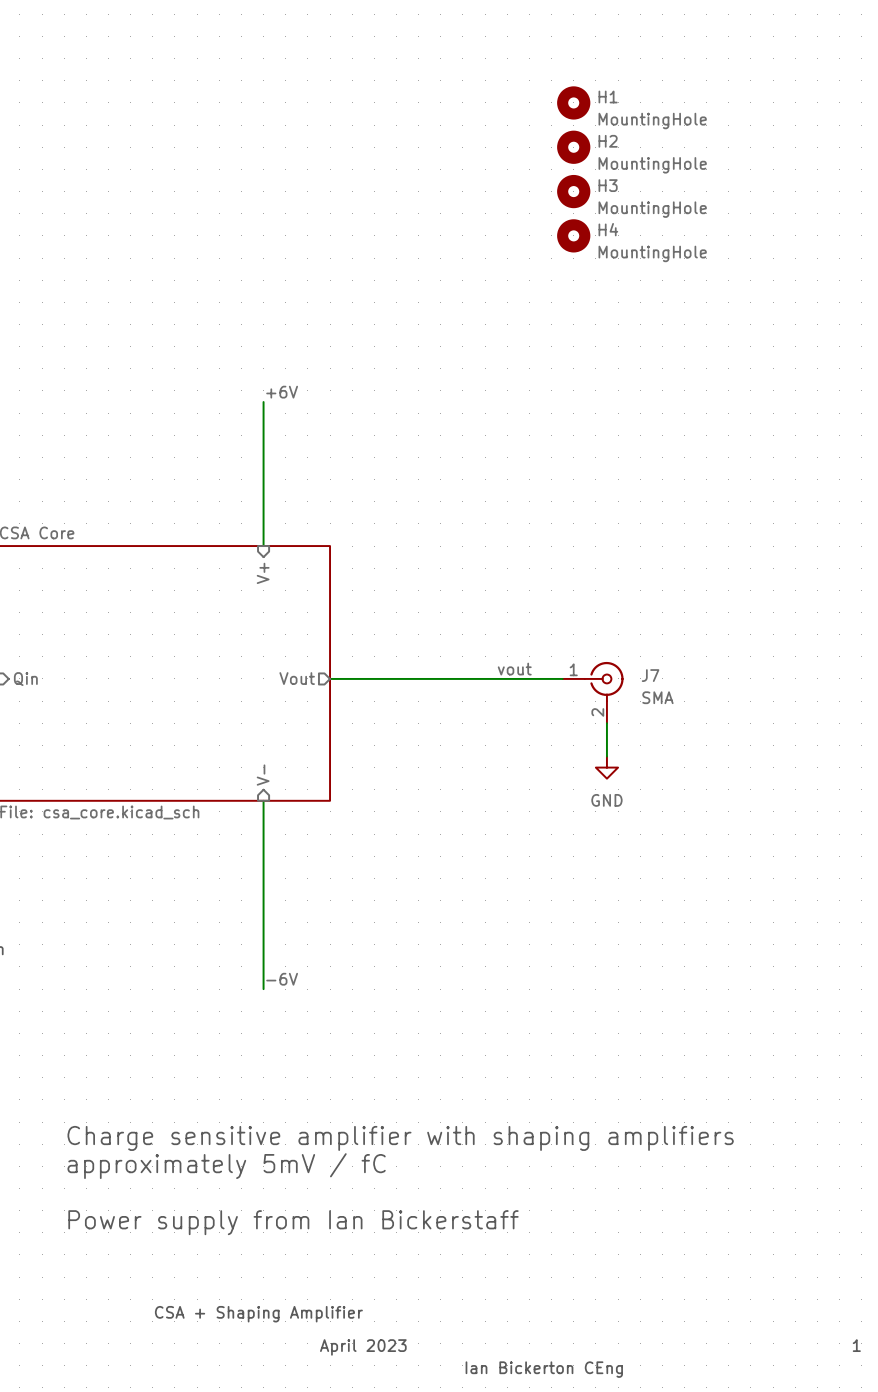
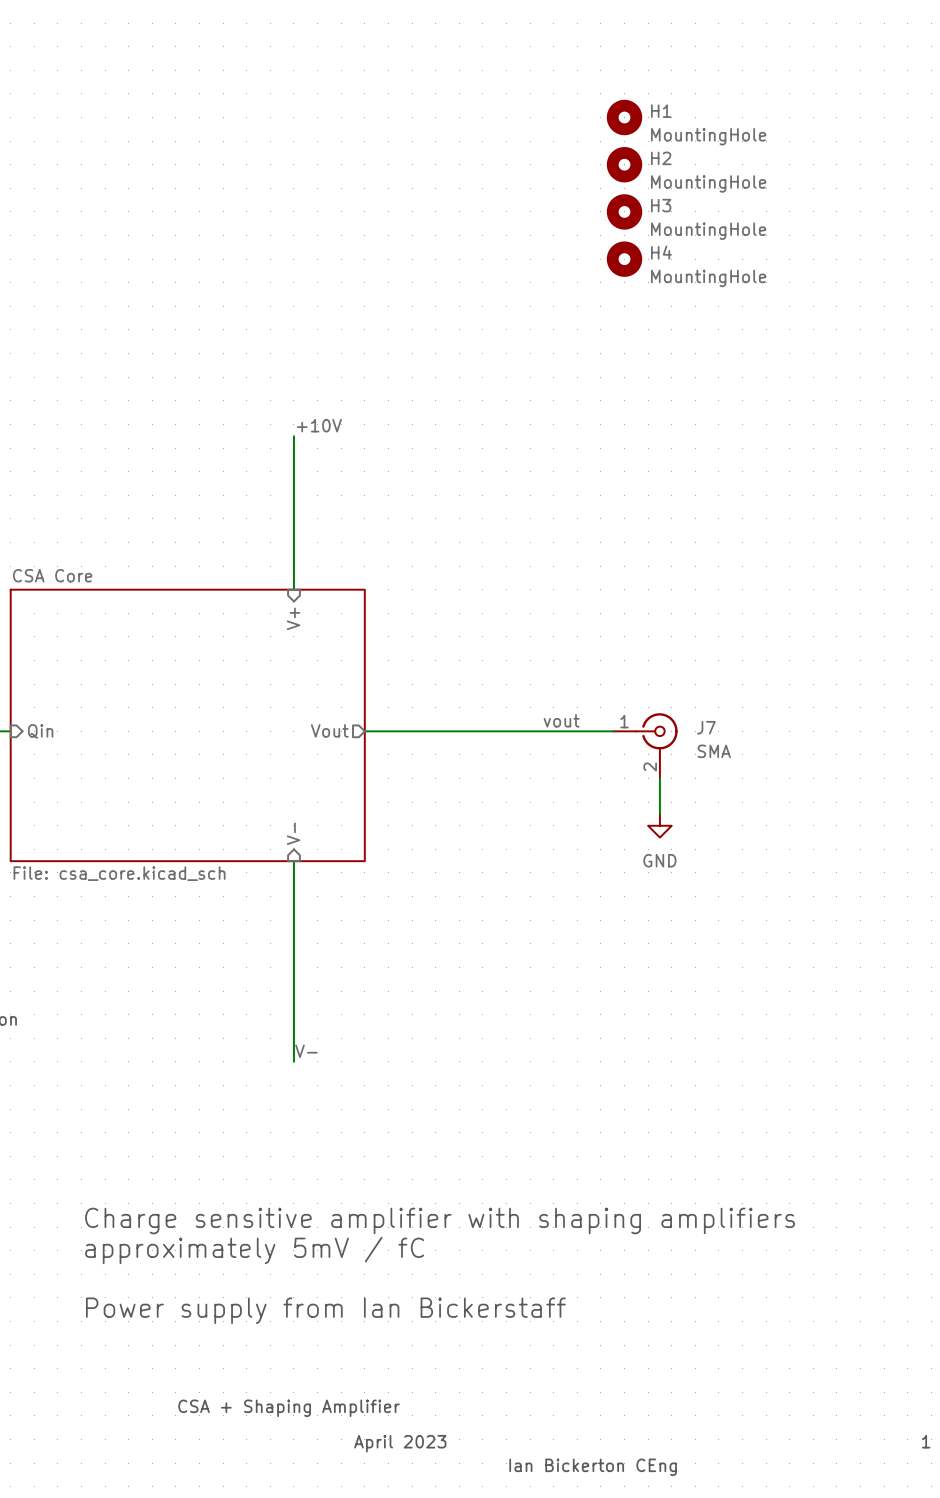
label: +6V (282, 392) -> +10V (319, 425)
label: -6V (282, 979) -> V- (306, 1051)

